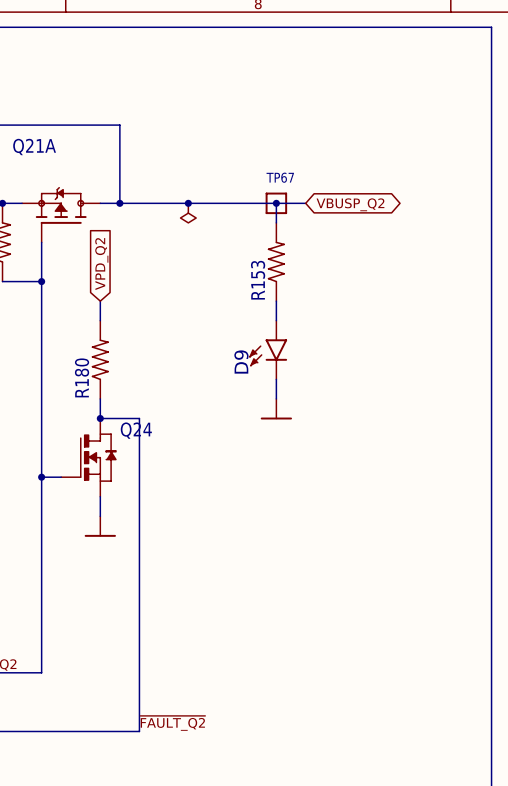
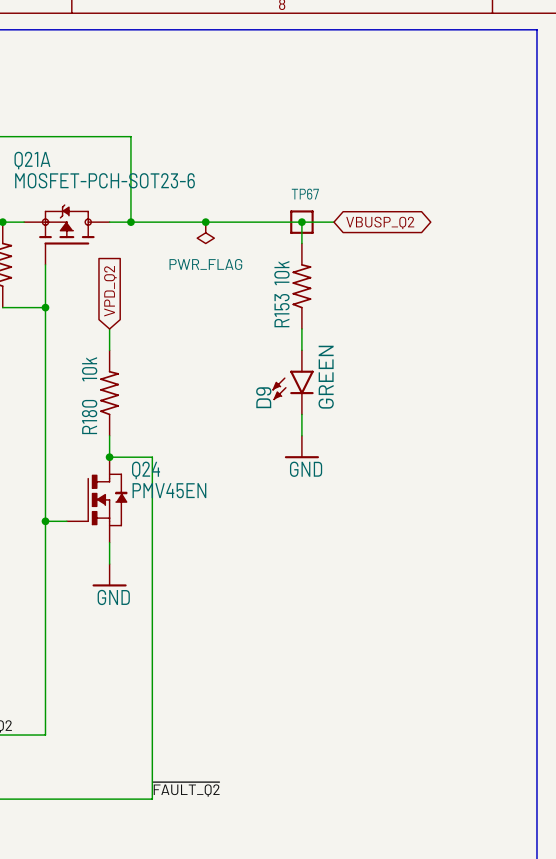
Q21A value: none -> MOSFET-PCH-SOT23-6 (105, 180)
power symbol text: none -> PWR_FLAG (205, 264)
R153 value: none -> 10k (281, 273)
R180 value: none -> 10k (89, 369)
D9 value: none -> GREEN (326, 377)
power symbol text: none -> GND (306, 469)
Q24 value: none -> PMV45EN (169, 490)
power symbol text: none -> GND (113, 597)

